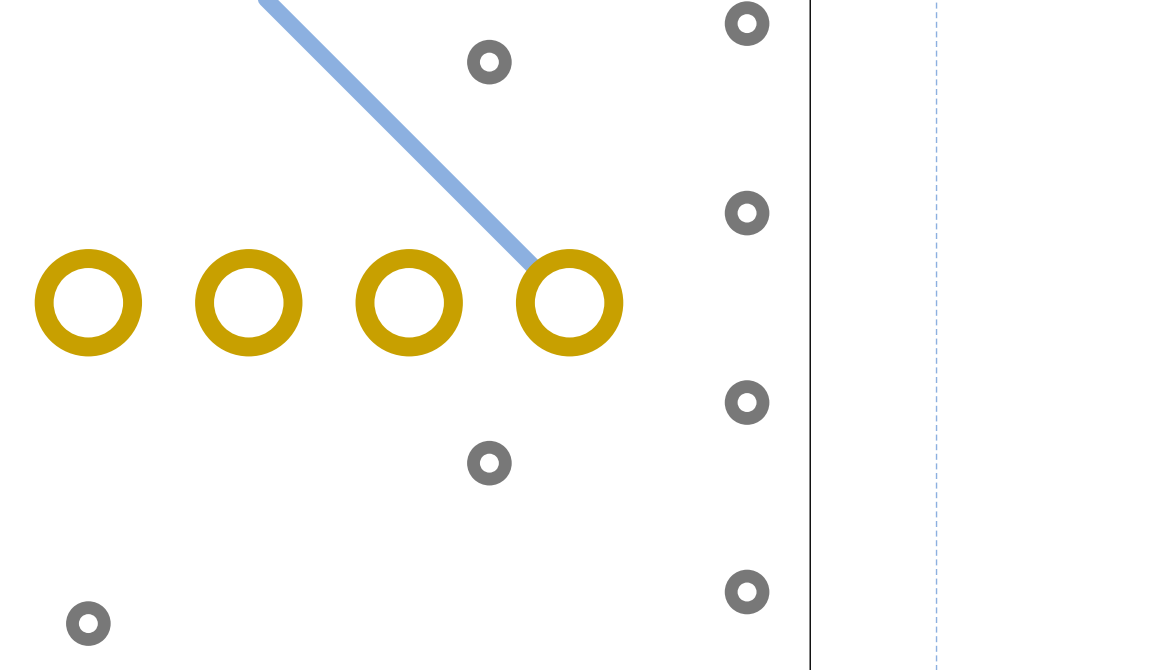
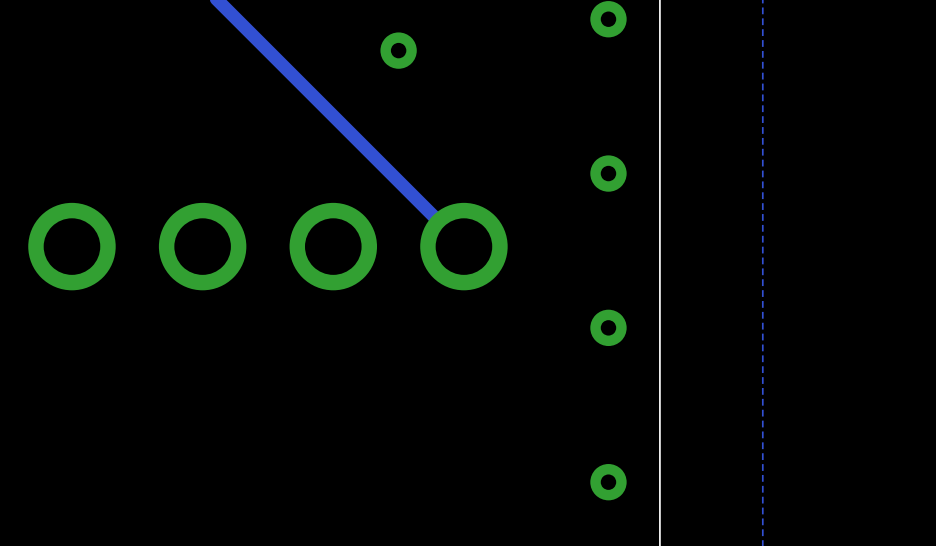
via: (489, 463) -> none
via: (88, 623) -> none

